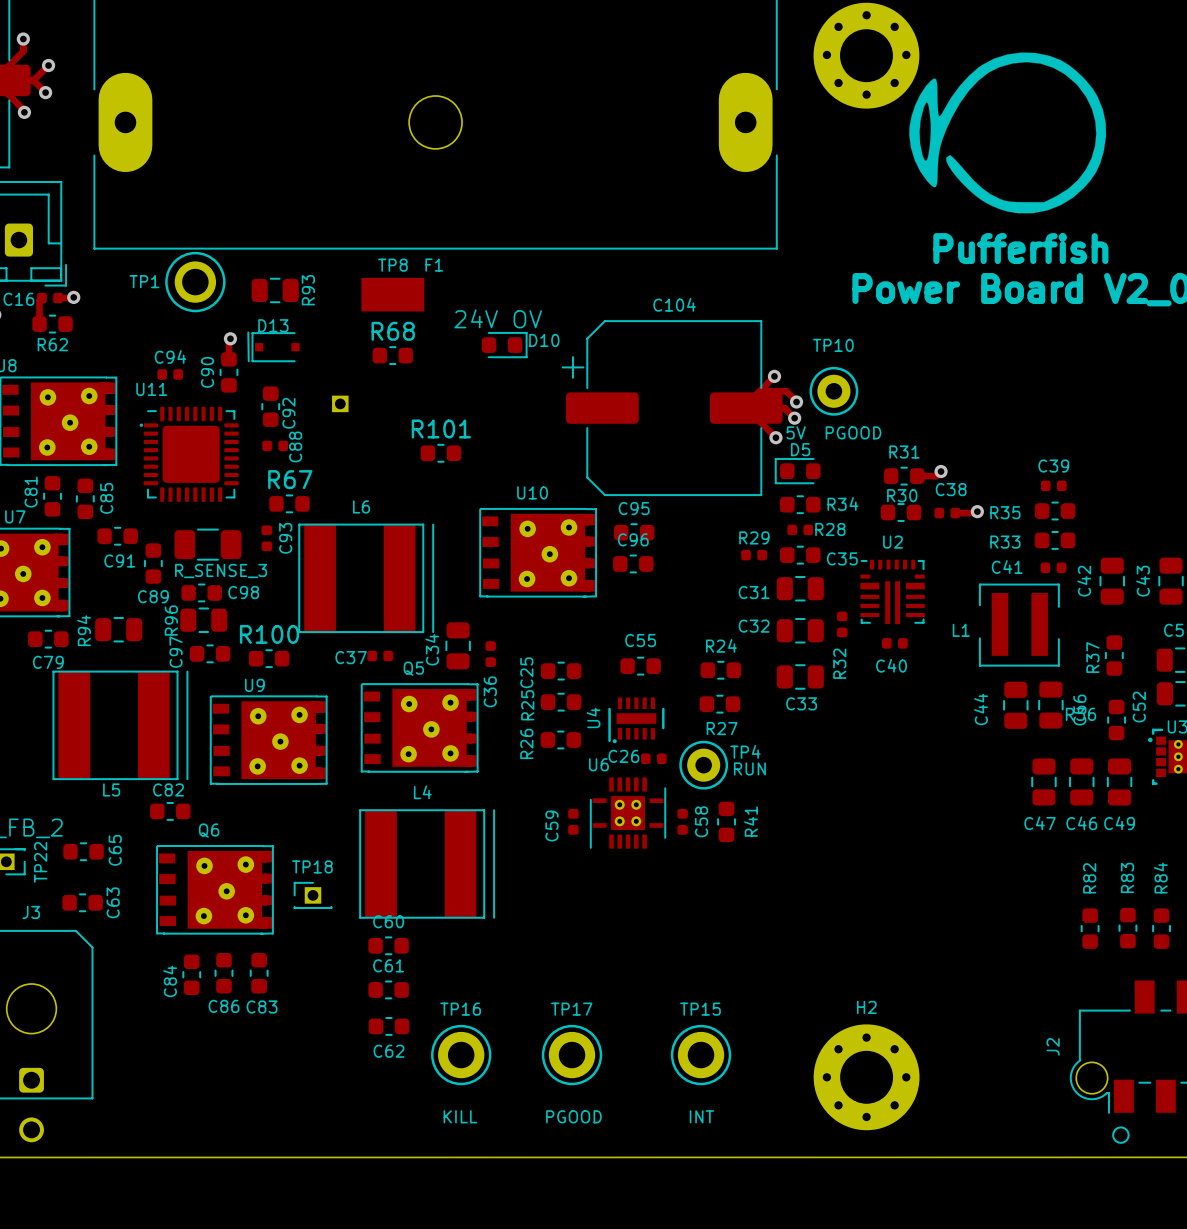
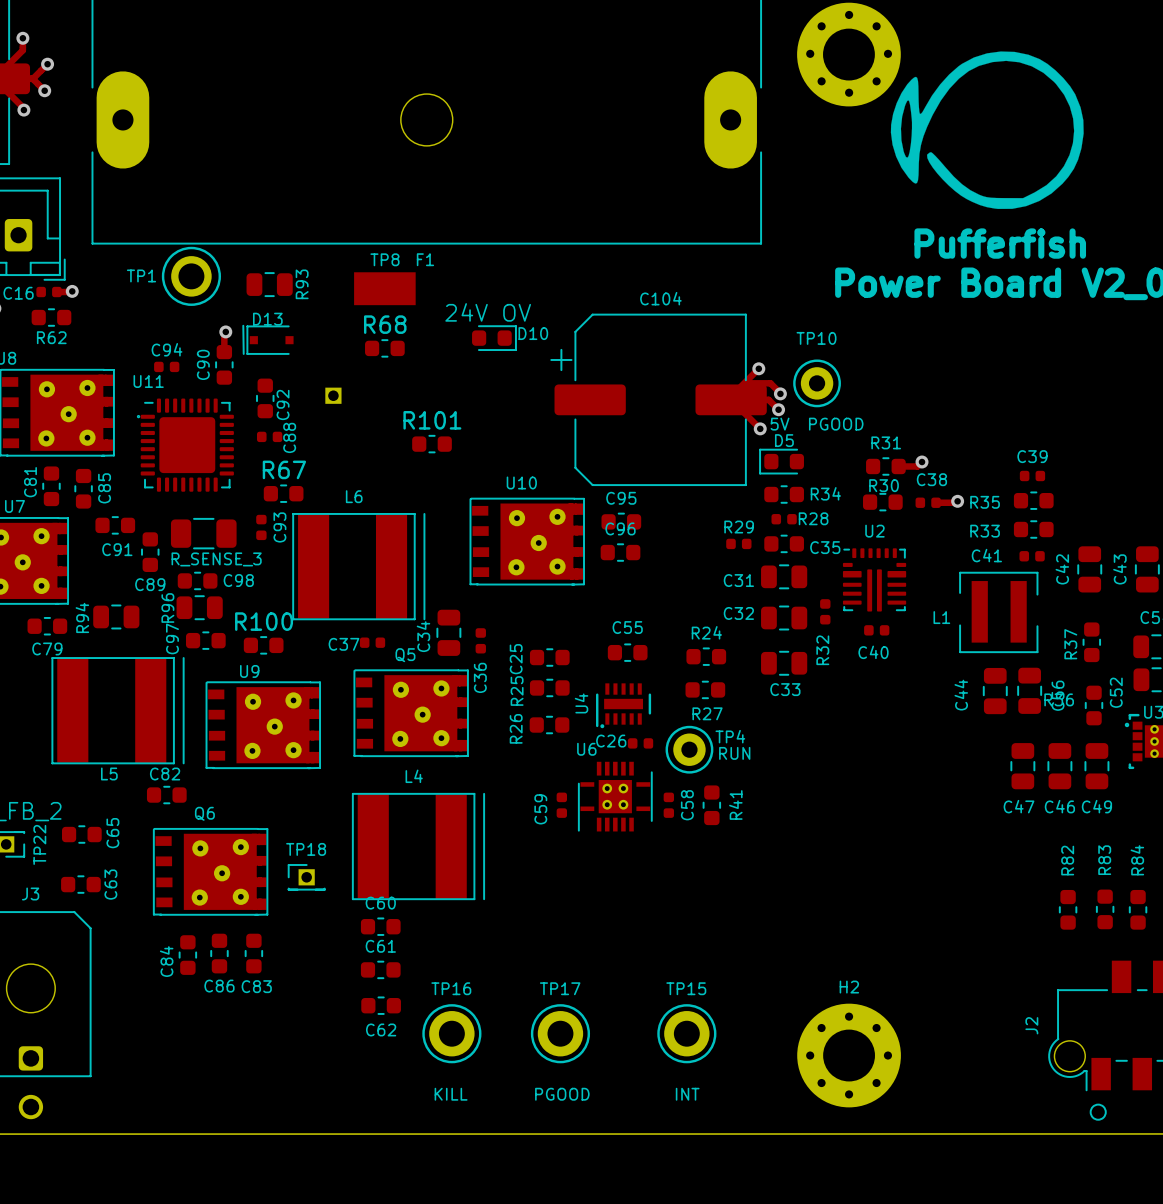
track: (42, 298) (39, 300) (39, 324) -> none

